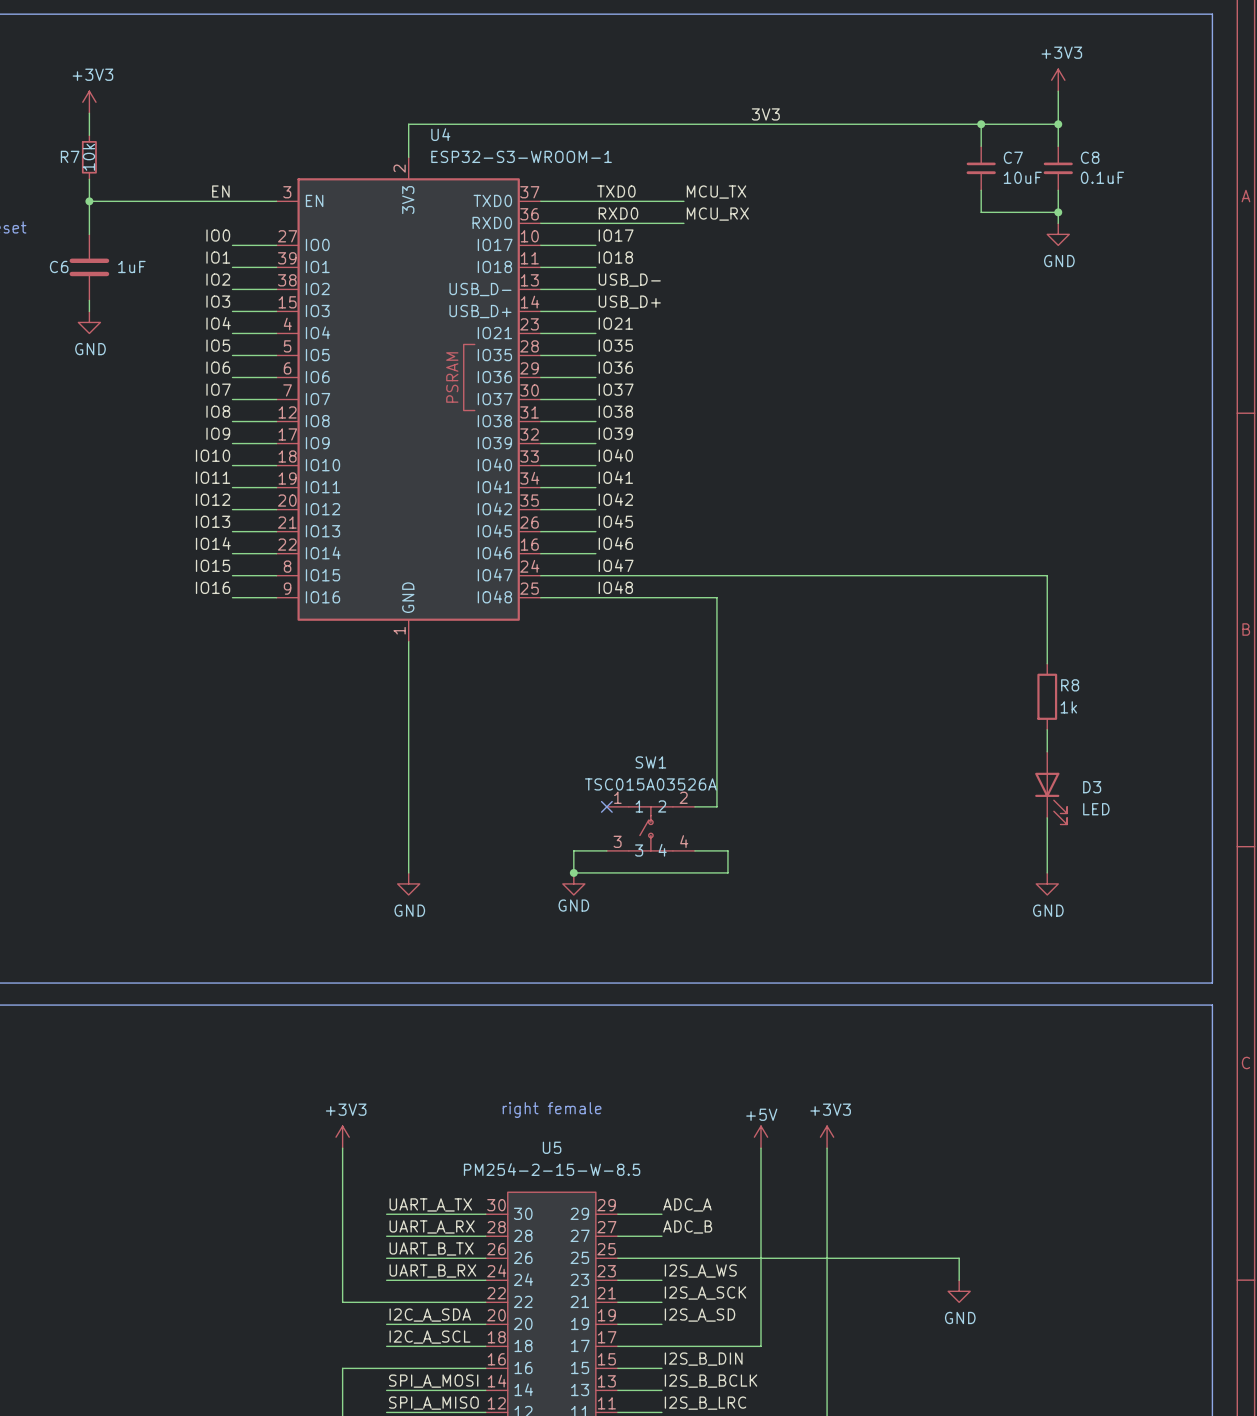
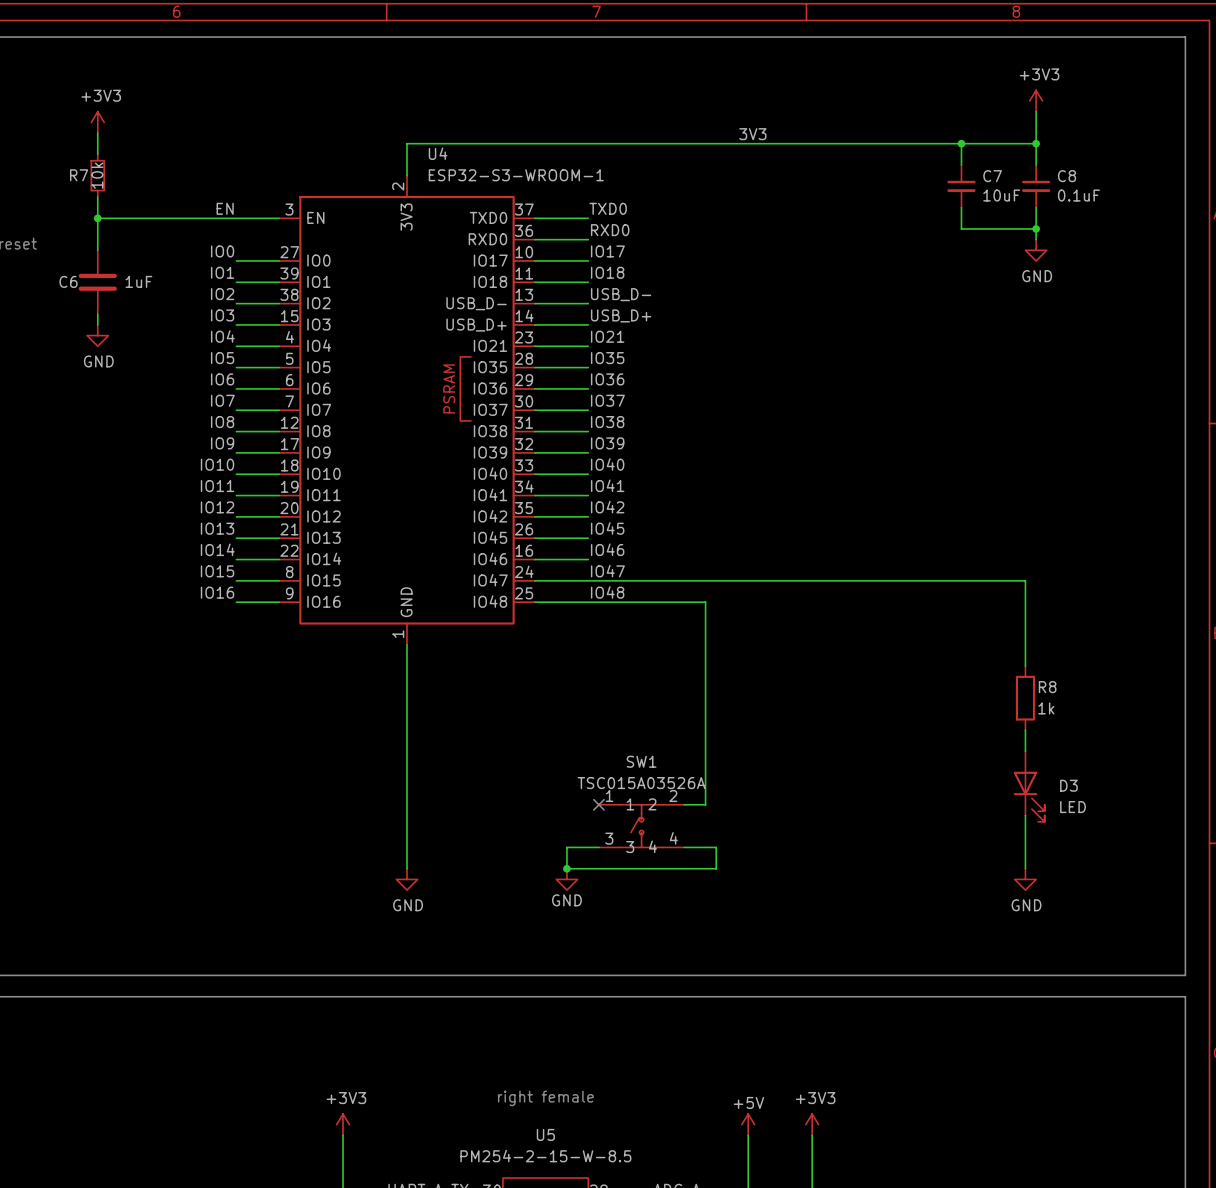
label: MCU_TX (716, 192) -> none
wire: (595, 201) (683, 201) -> none
label: MCU_RX (717, 214) -> none
wire: (595, 223) (683, 223) -> none

